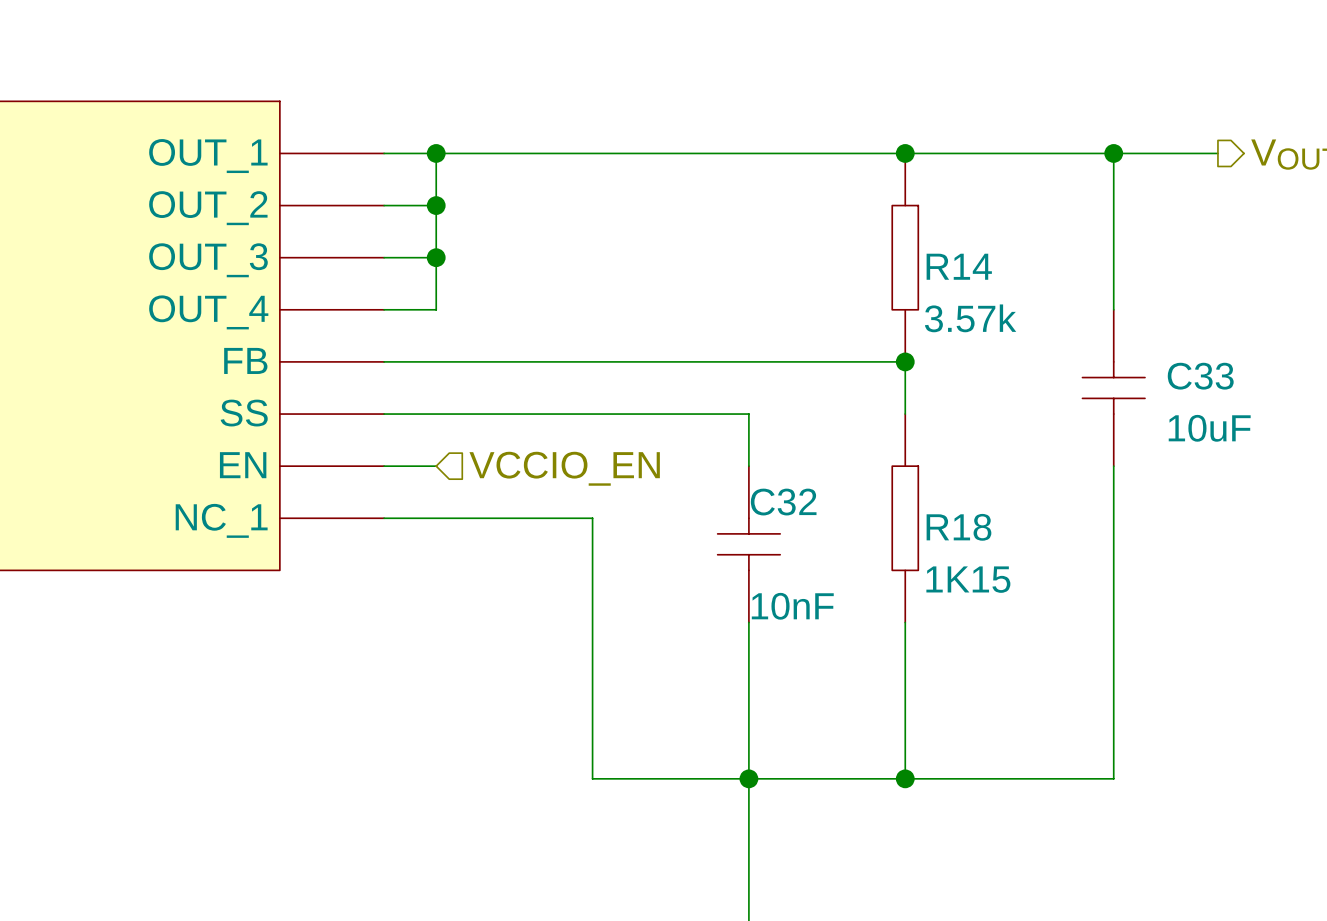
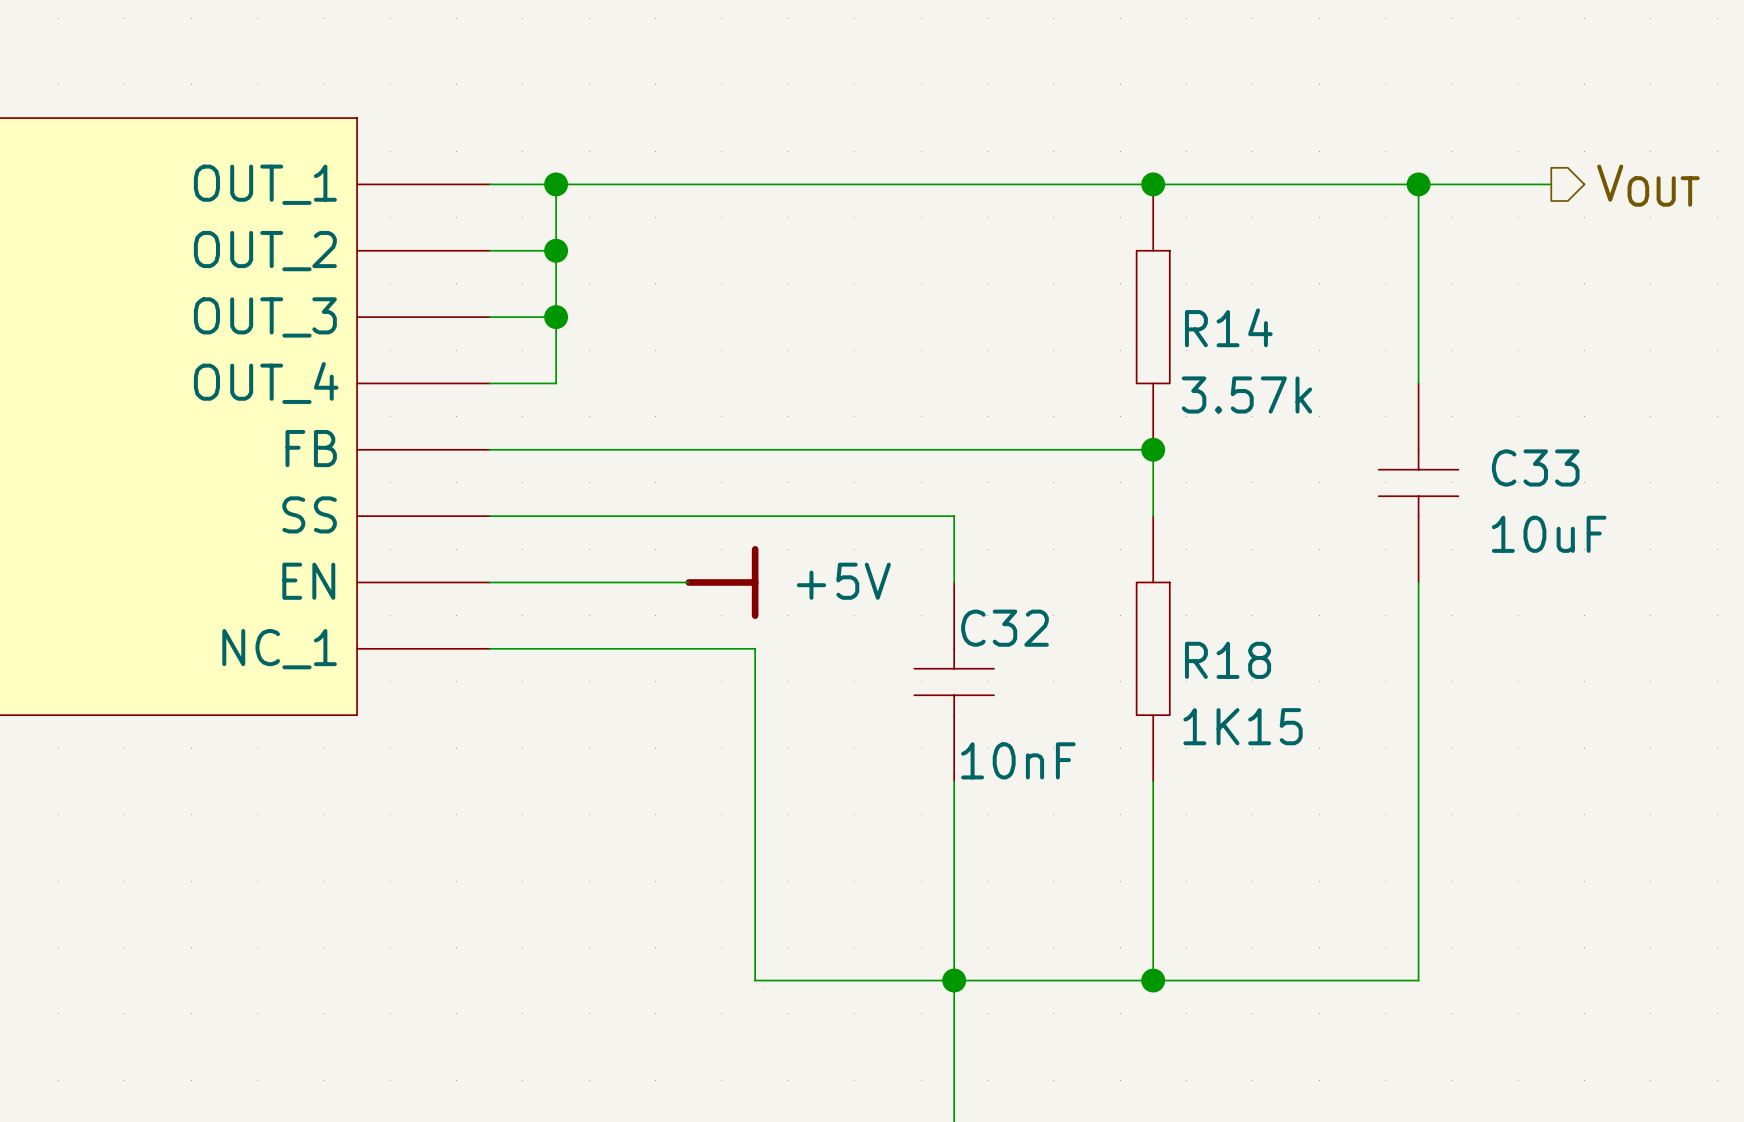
wire: none -> (556, 582) (688, 582)
power symbol: none -> +5V (721, 582)
hierarchical label: VCCIO_EN (564, 468) -> none

